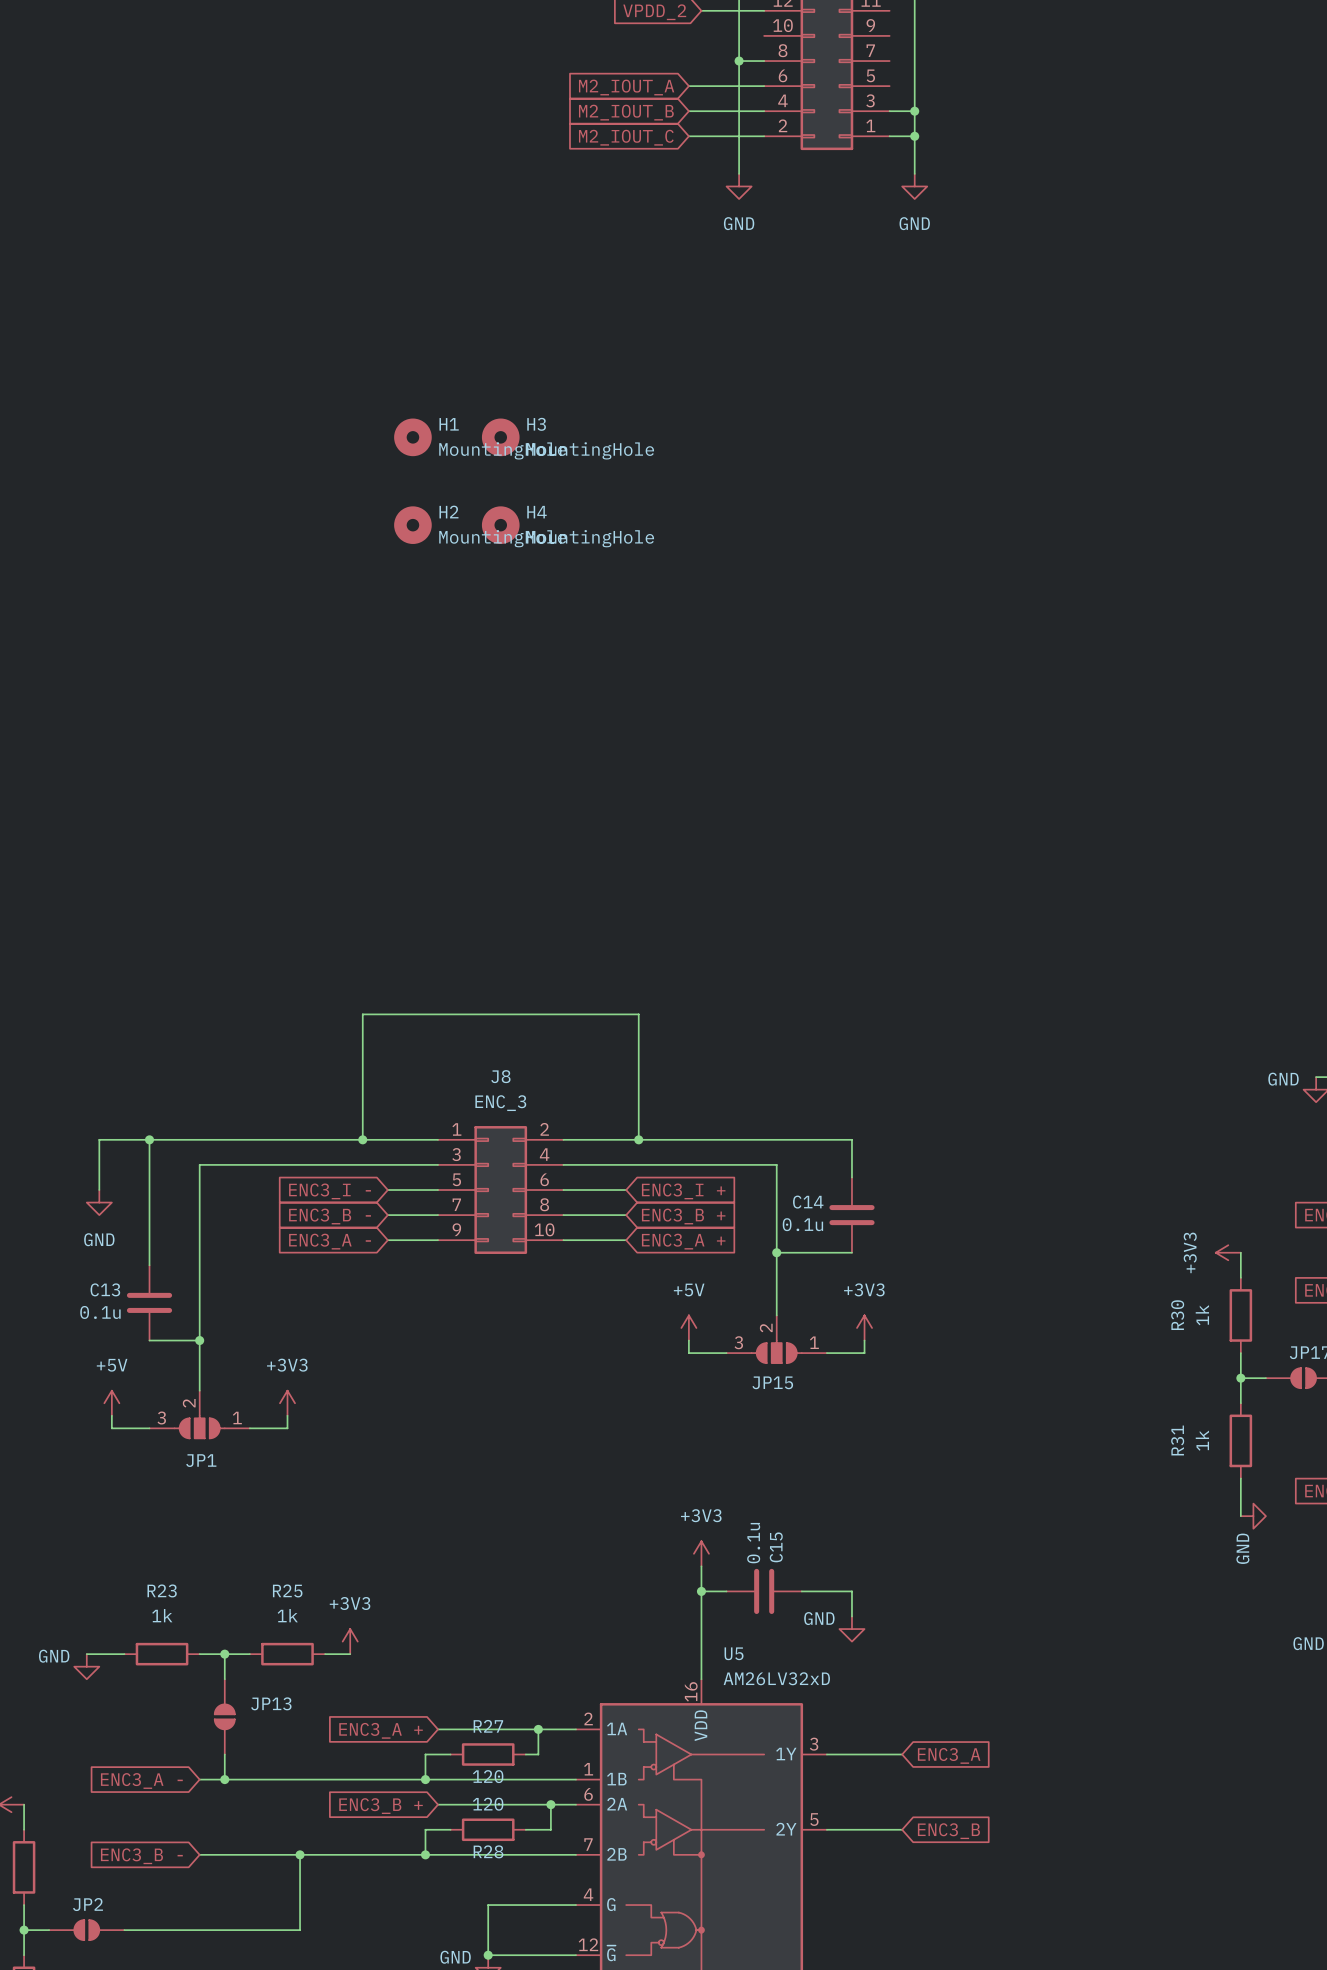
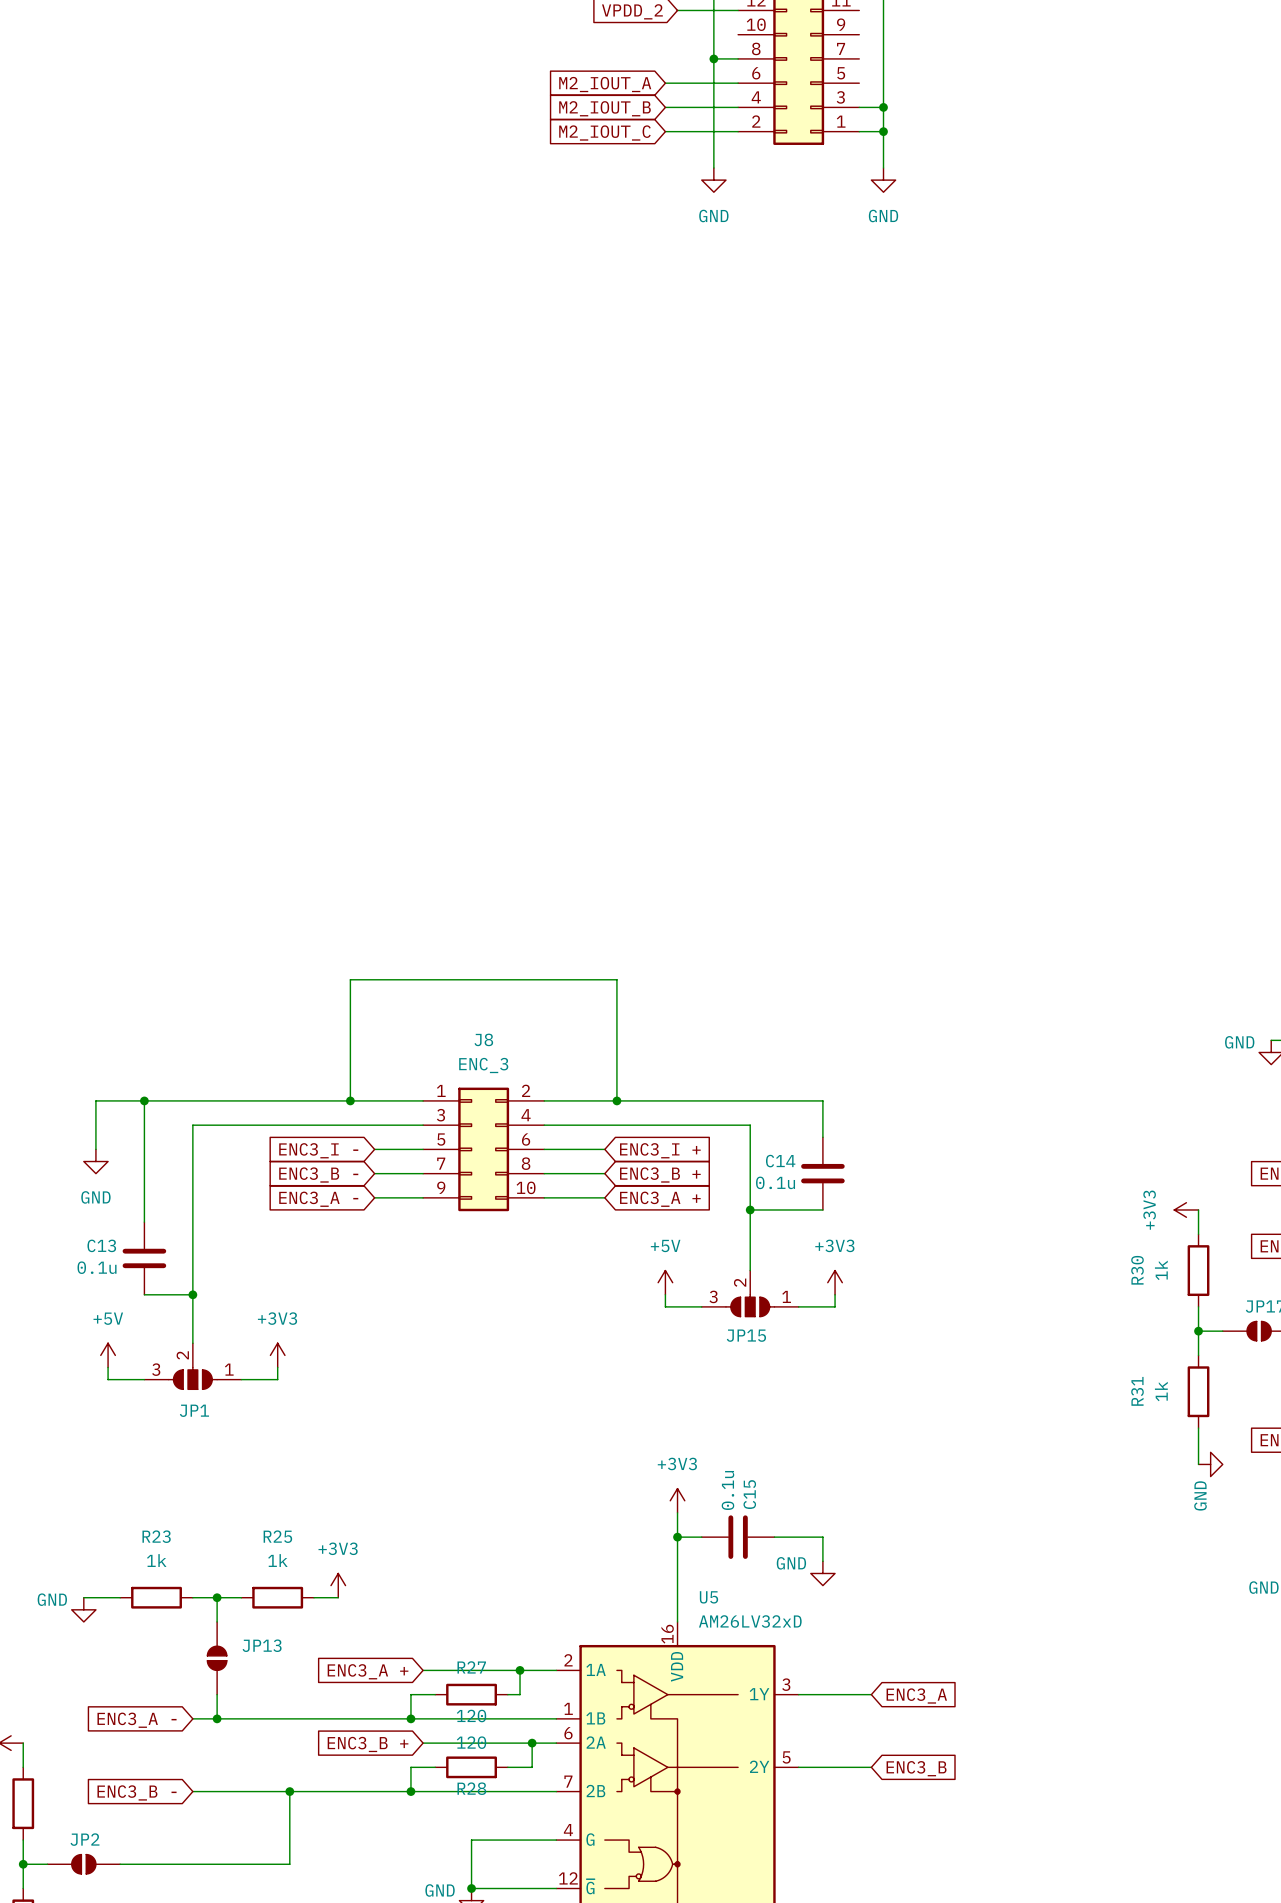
H1: MountingHole (412, 437) -> none
H3: MountingHole (500, 437) -> none
H2: MountingHole (412, 525) -> none
H4: MountingHole (500, 525) -> none

